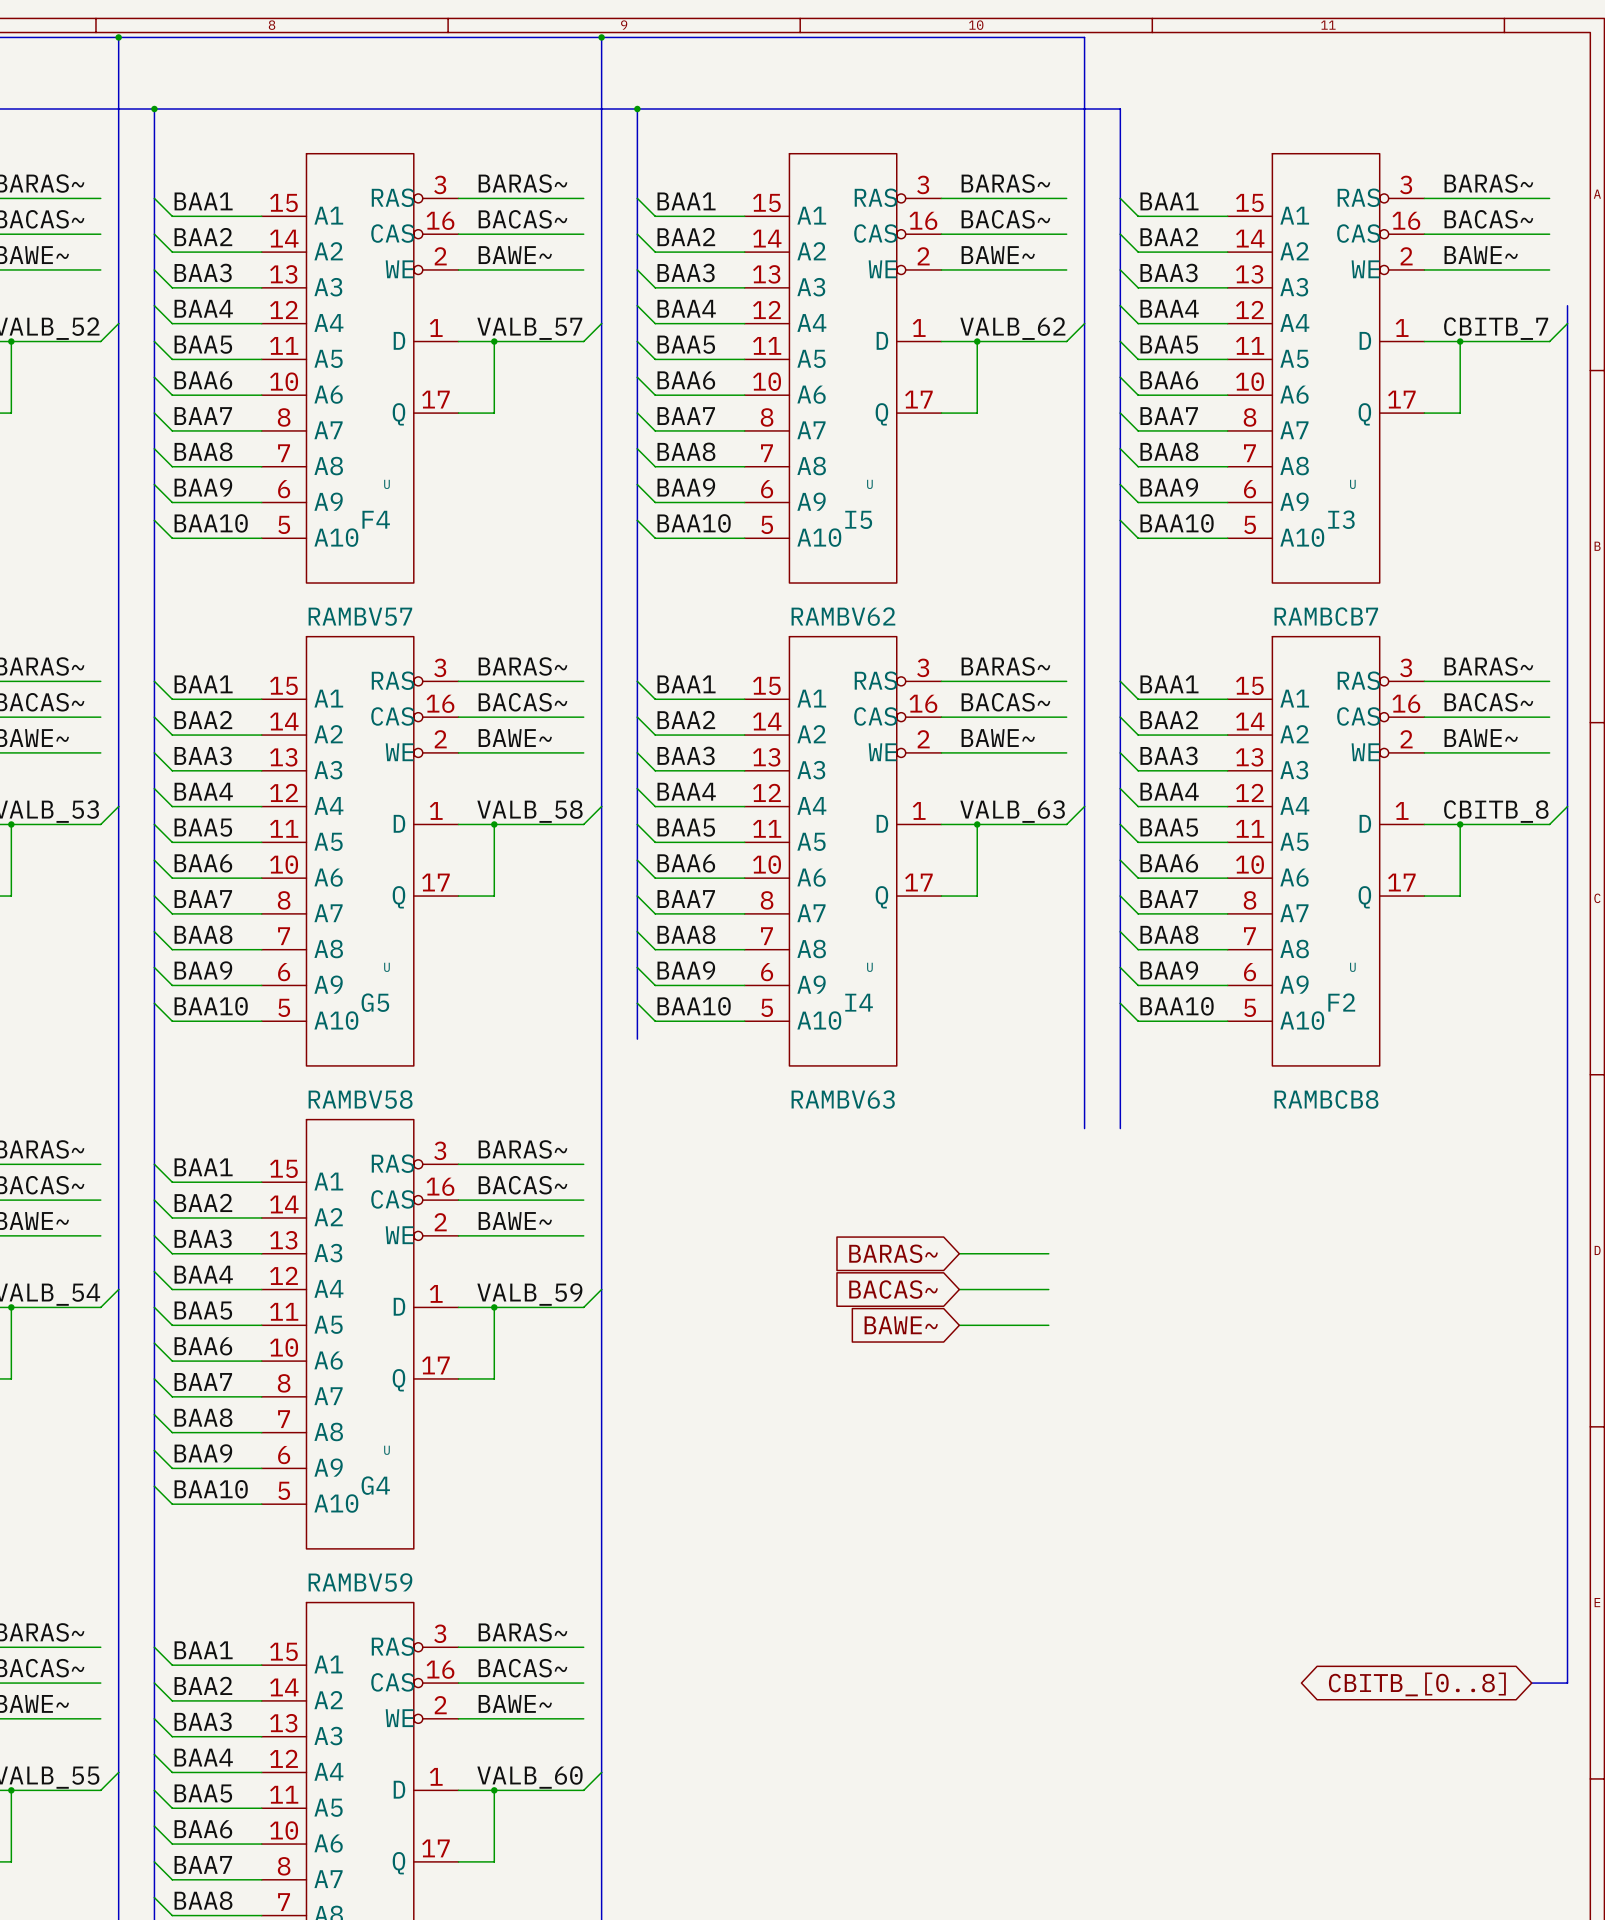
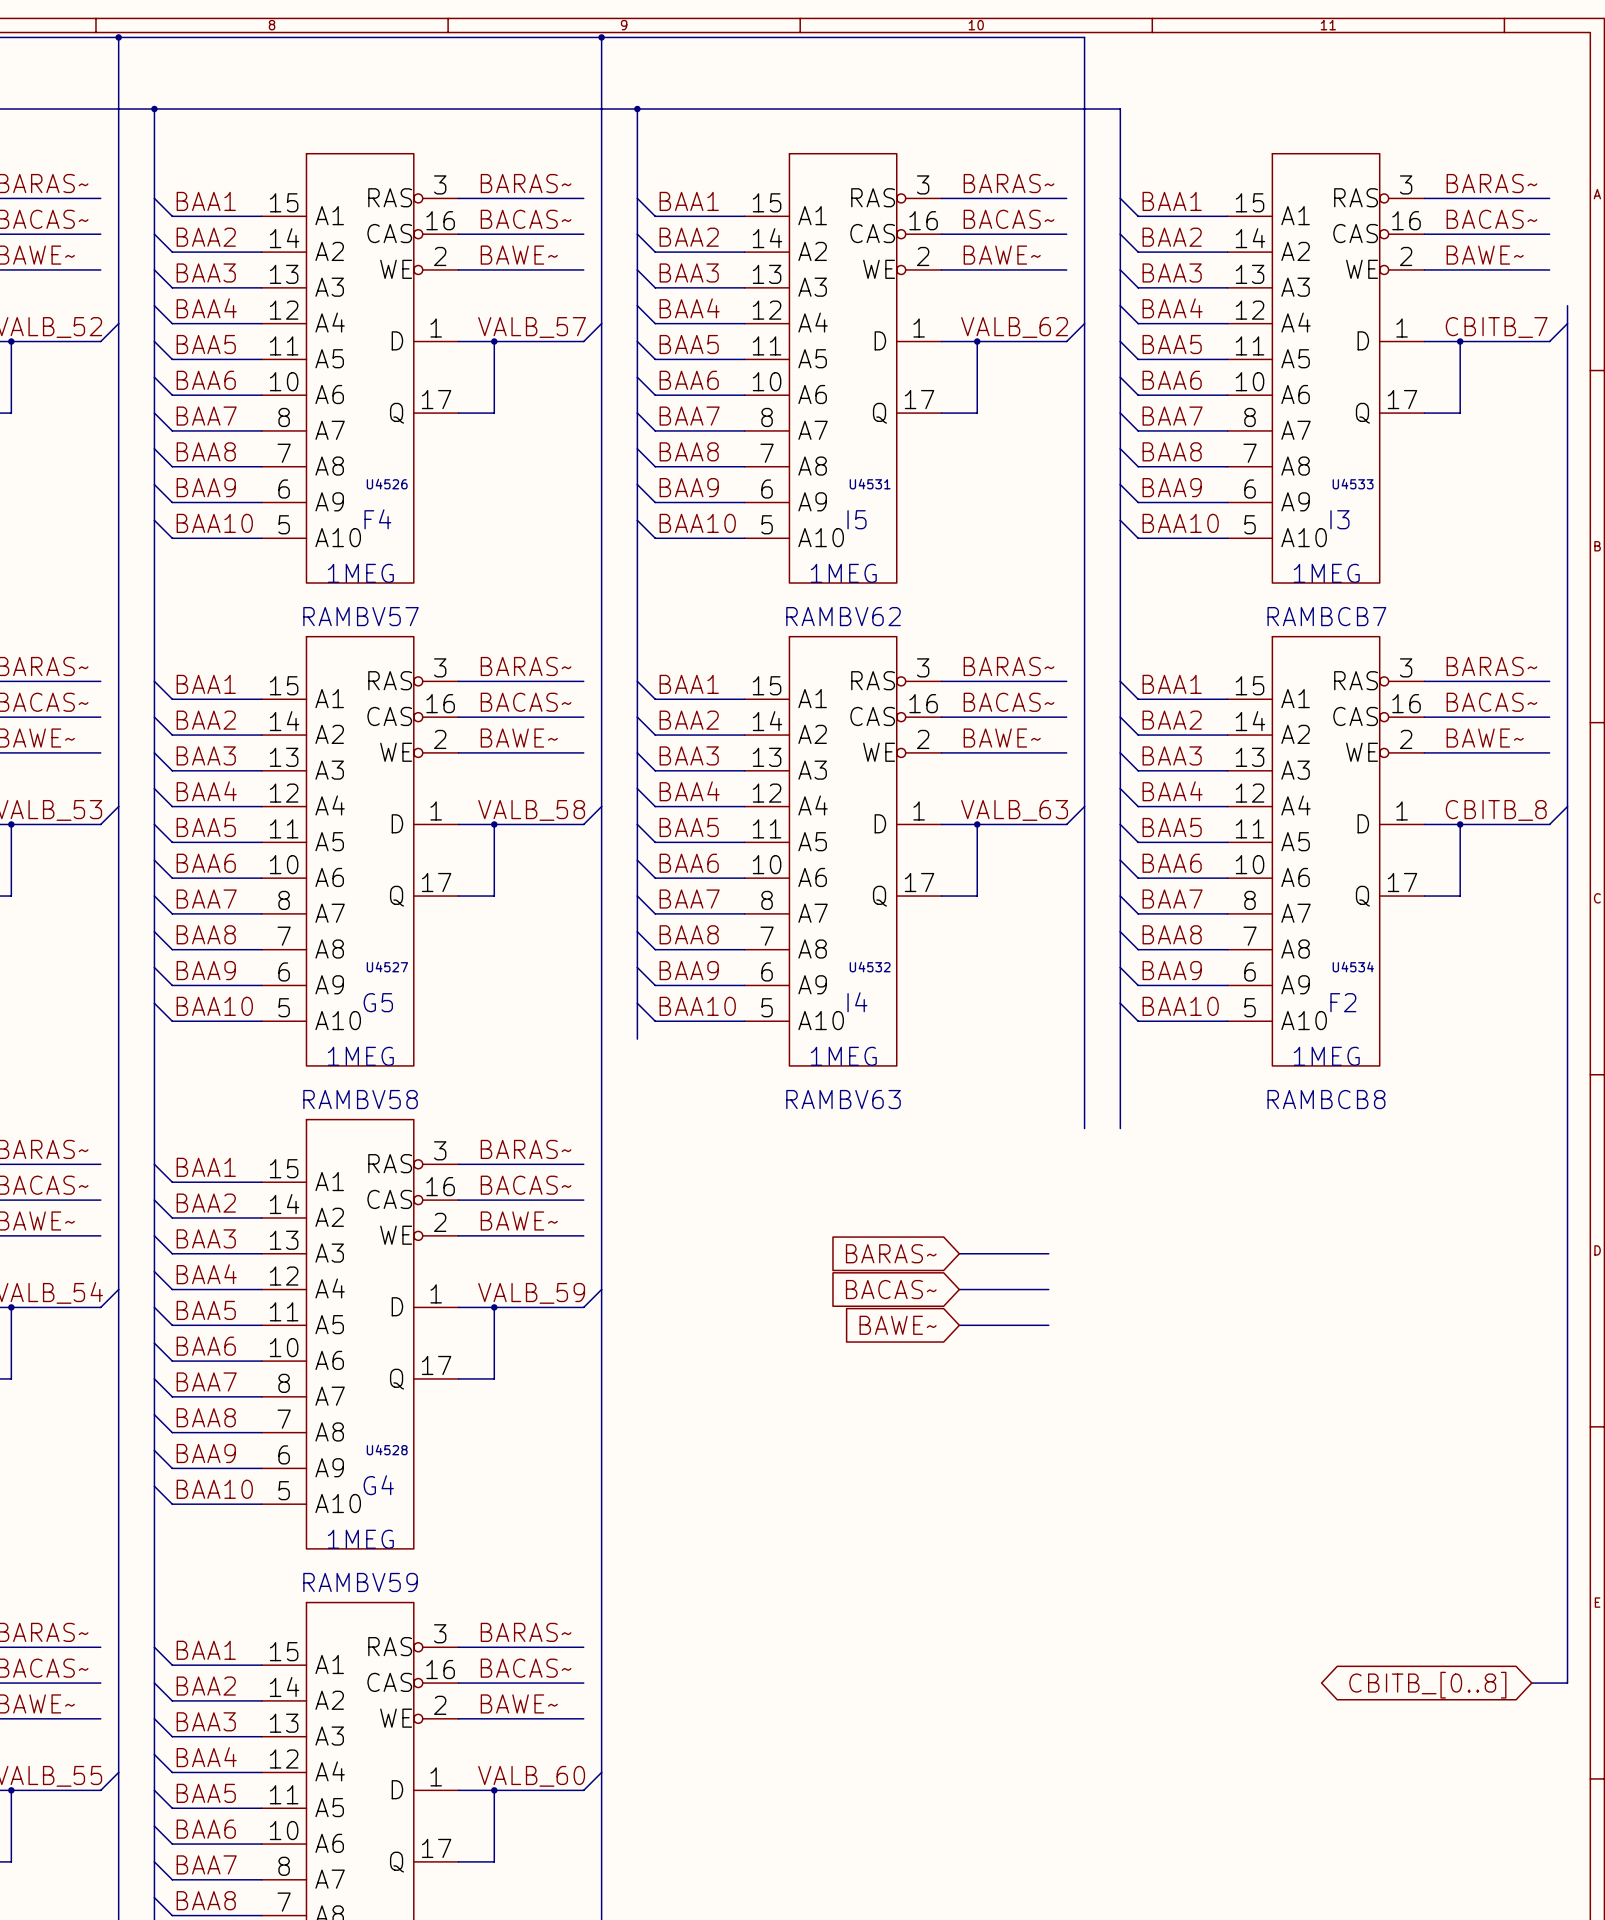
U name: U (386, 484) -> U4526 (387, 484)
U name: U (869, 484) -> U4531 (870, 484)
U name: U (1352, 484) -> U4533 (1353, 484)
U value: none -> 1MEG (360, 573)
U value: none -> 1MEG (843, 573)
U value: none -> 1MEG (1326, 573)
U name: U (386, 967) -> U4527 (387, 967)
U name: U (869, 967) -> U4532 (870, 967)
U name: U (1352, 967) -> U4534 (1353, 967)
U value: none -> 1MEG (360, 1056)
U value: none -> 1MEG (843, 1056)
U value: none -> 1MEG (1326, 1056)
U name: U (386, 1450) -> U4528 (387, 1449)
U value: none -> 1MEG (360, 1539)

